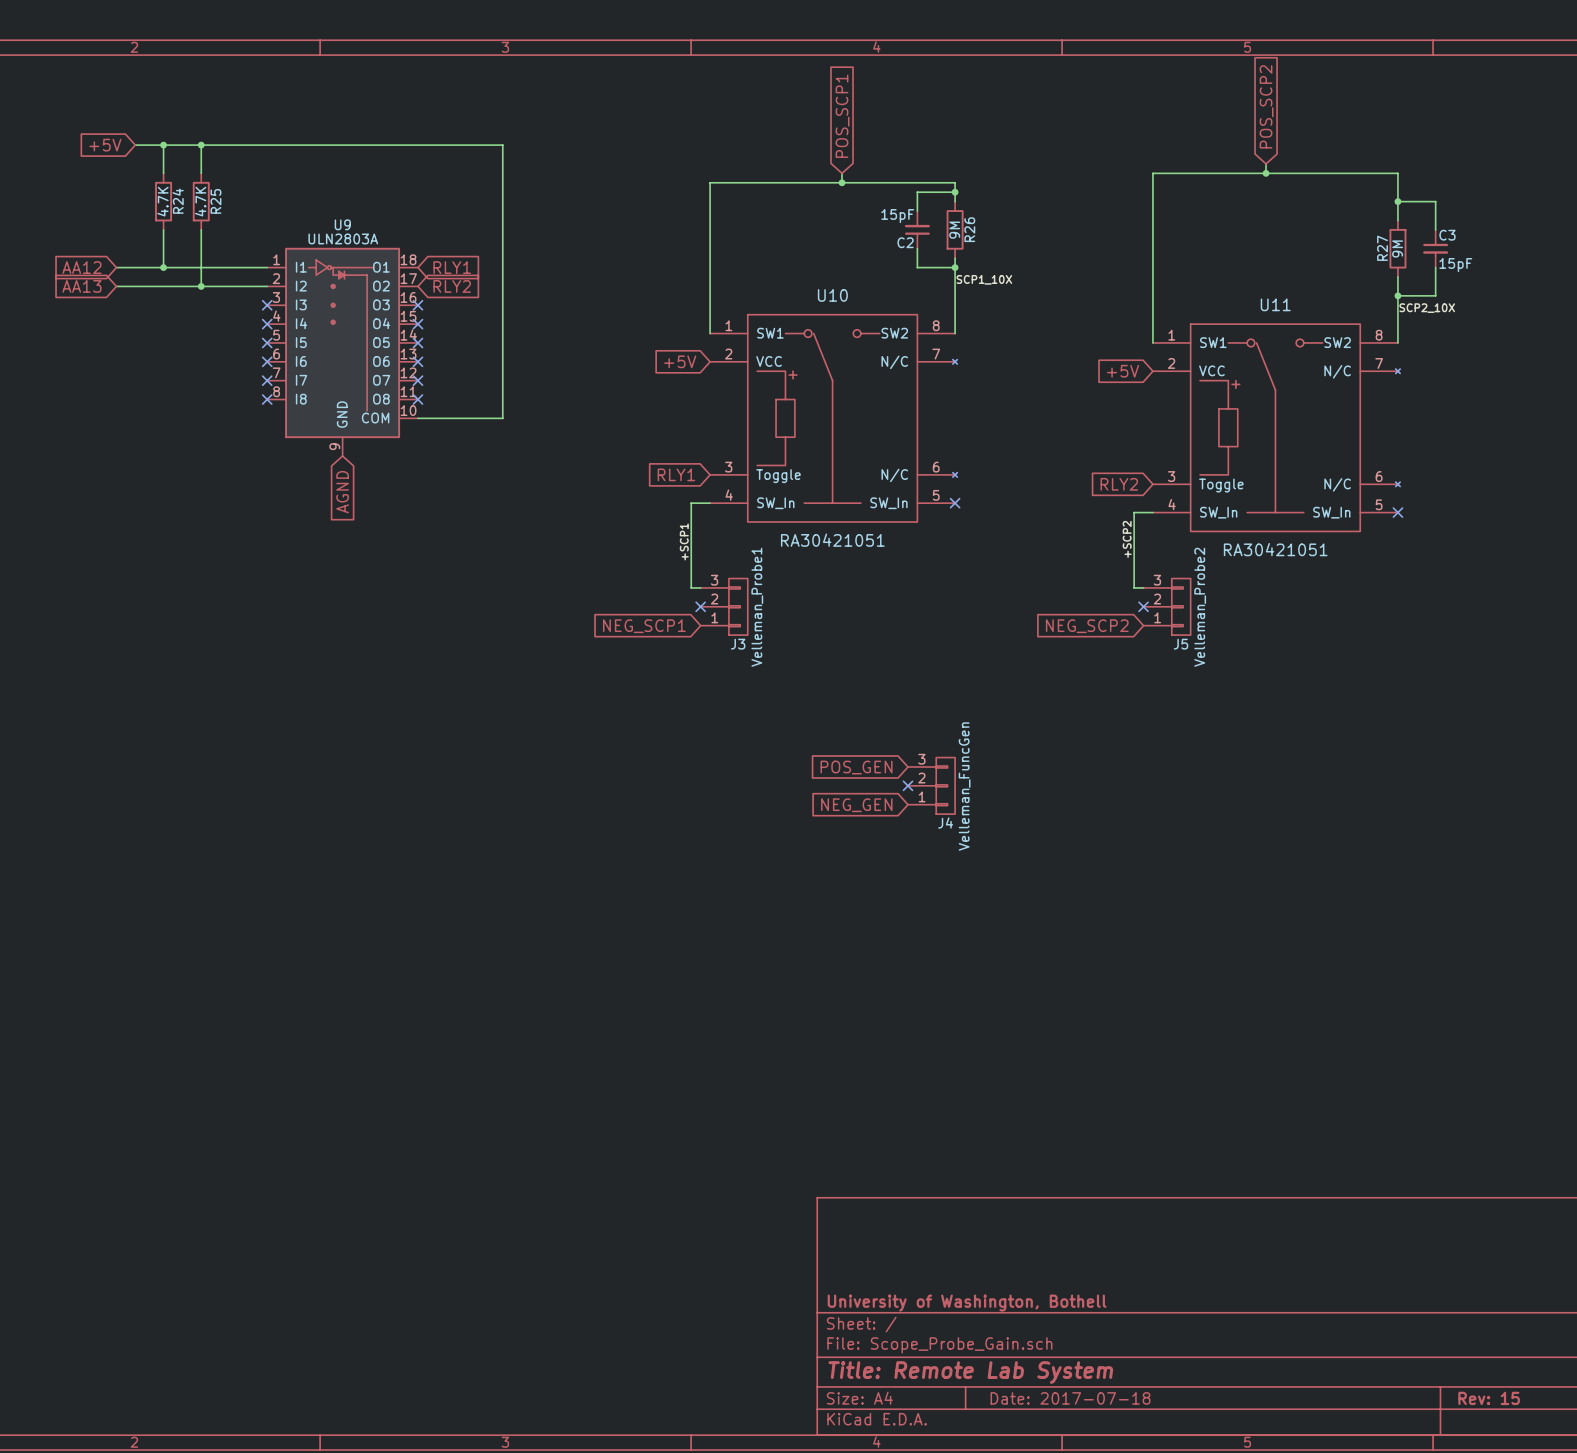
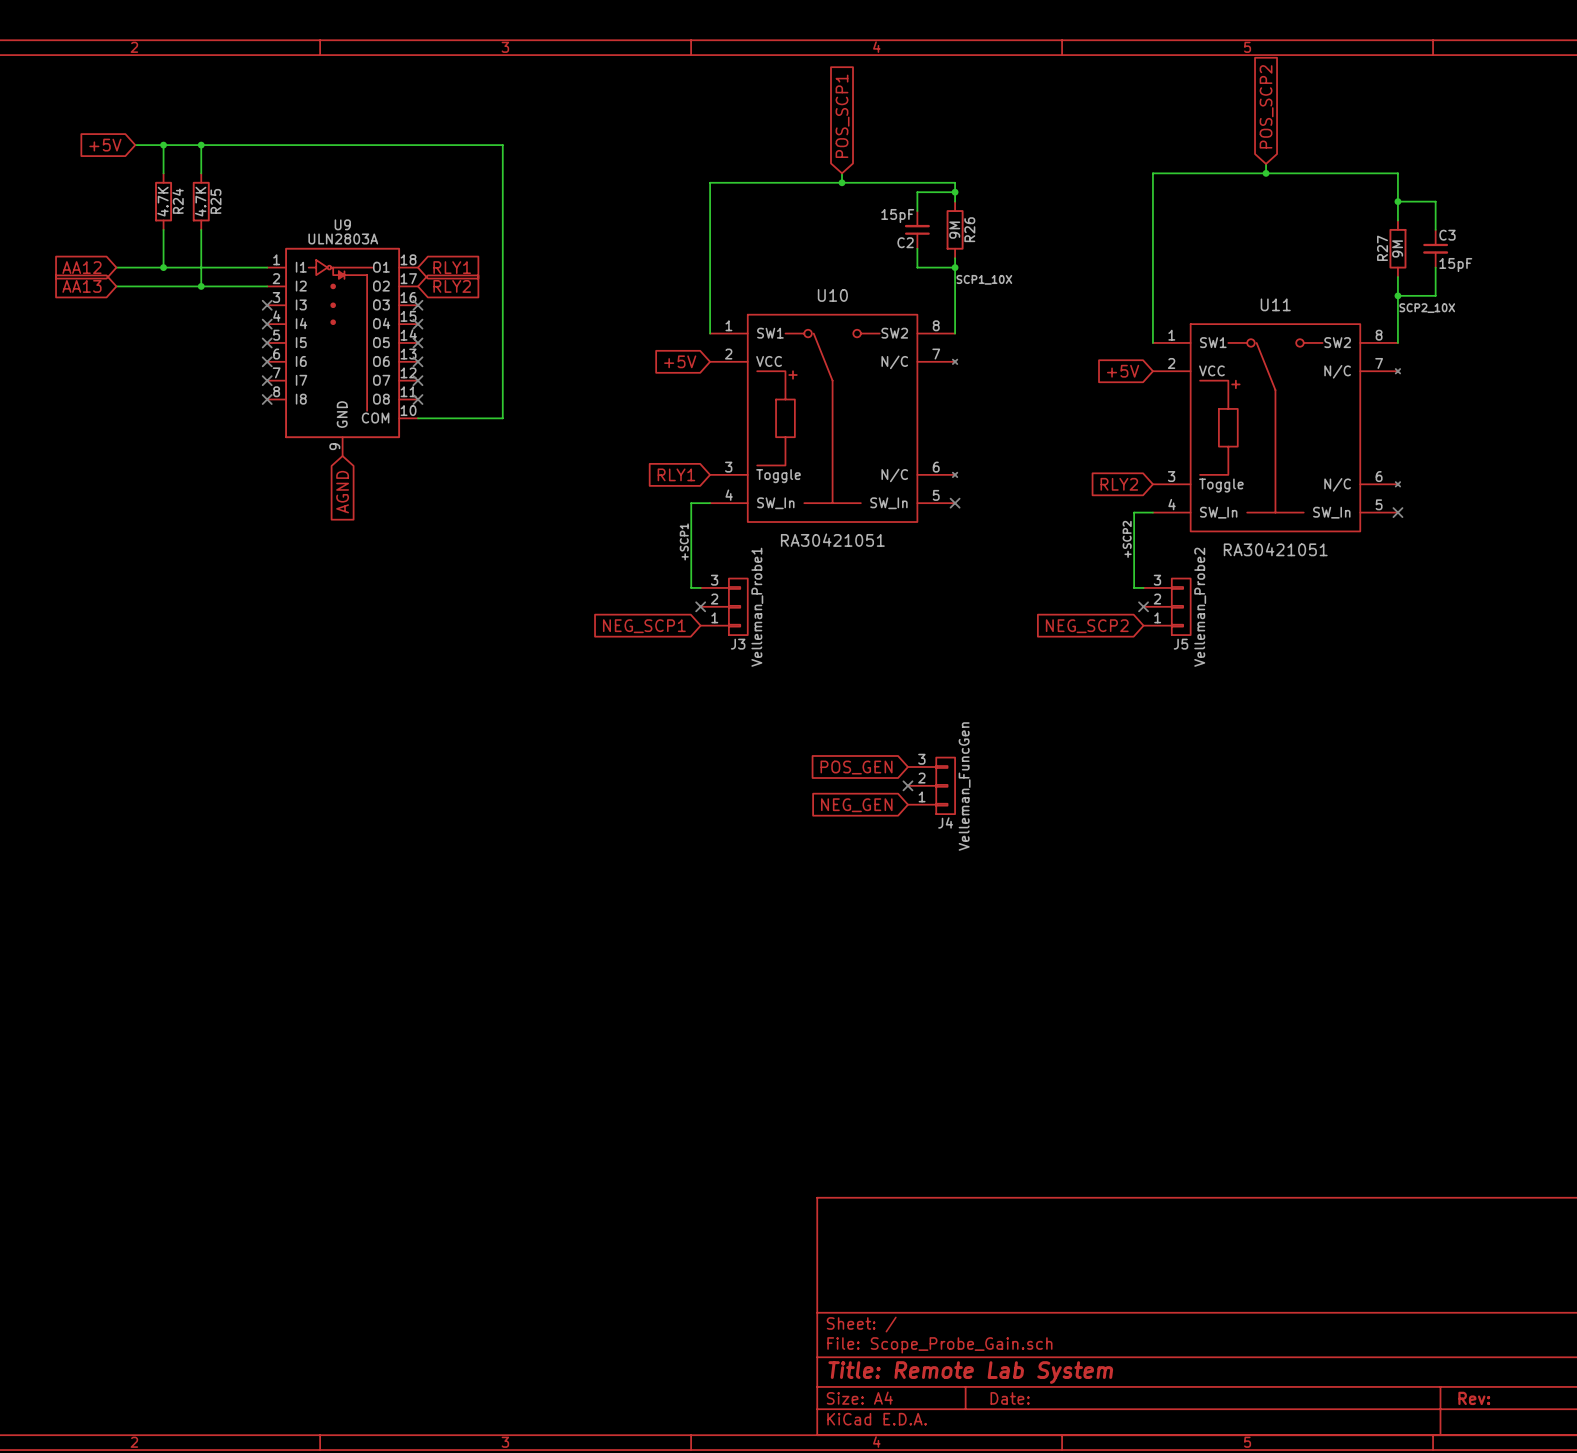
title block: University of Washington, Bothell (967, 1303) -> none
title block: Date: 2017-07-18 (1070, 1398) -> Date: (1010, 1398)
title block: Rev: 15 (1489, 1398) -> Rev: (1474, 1398)

